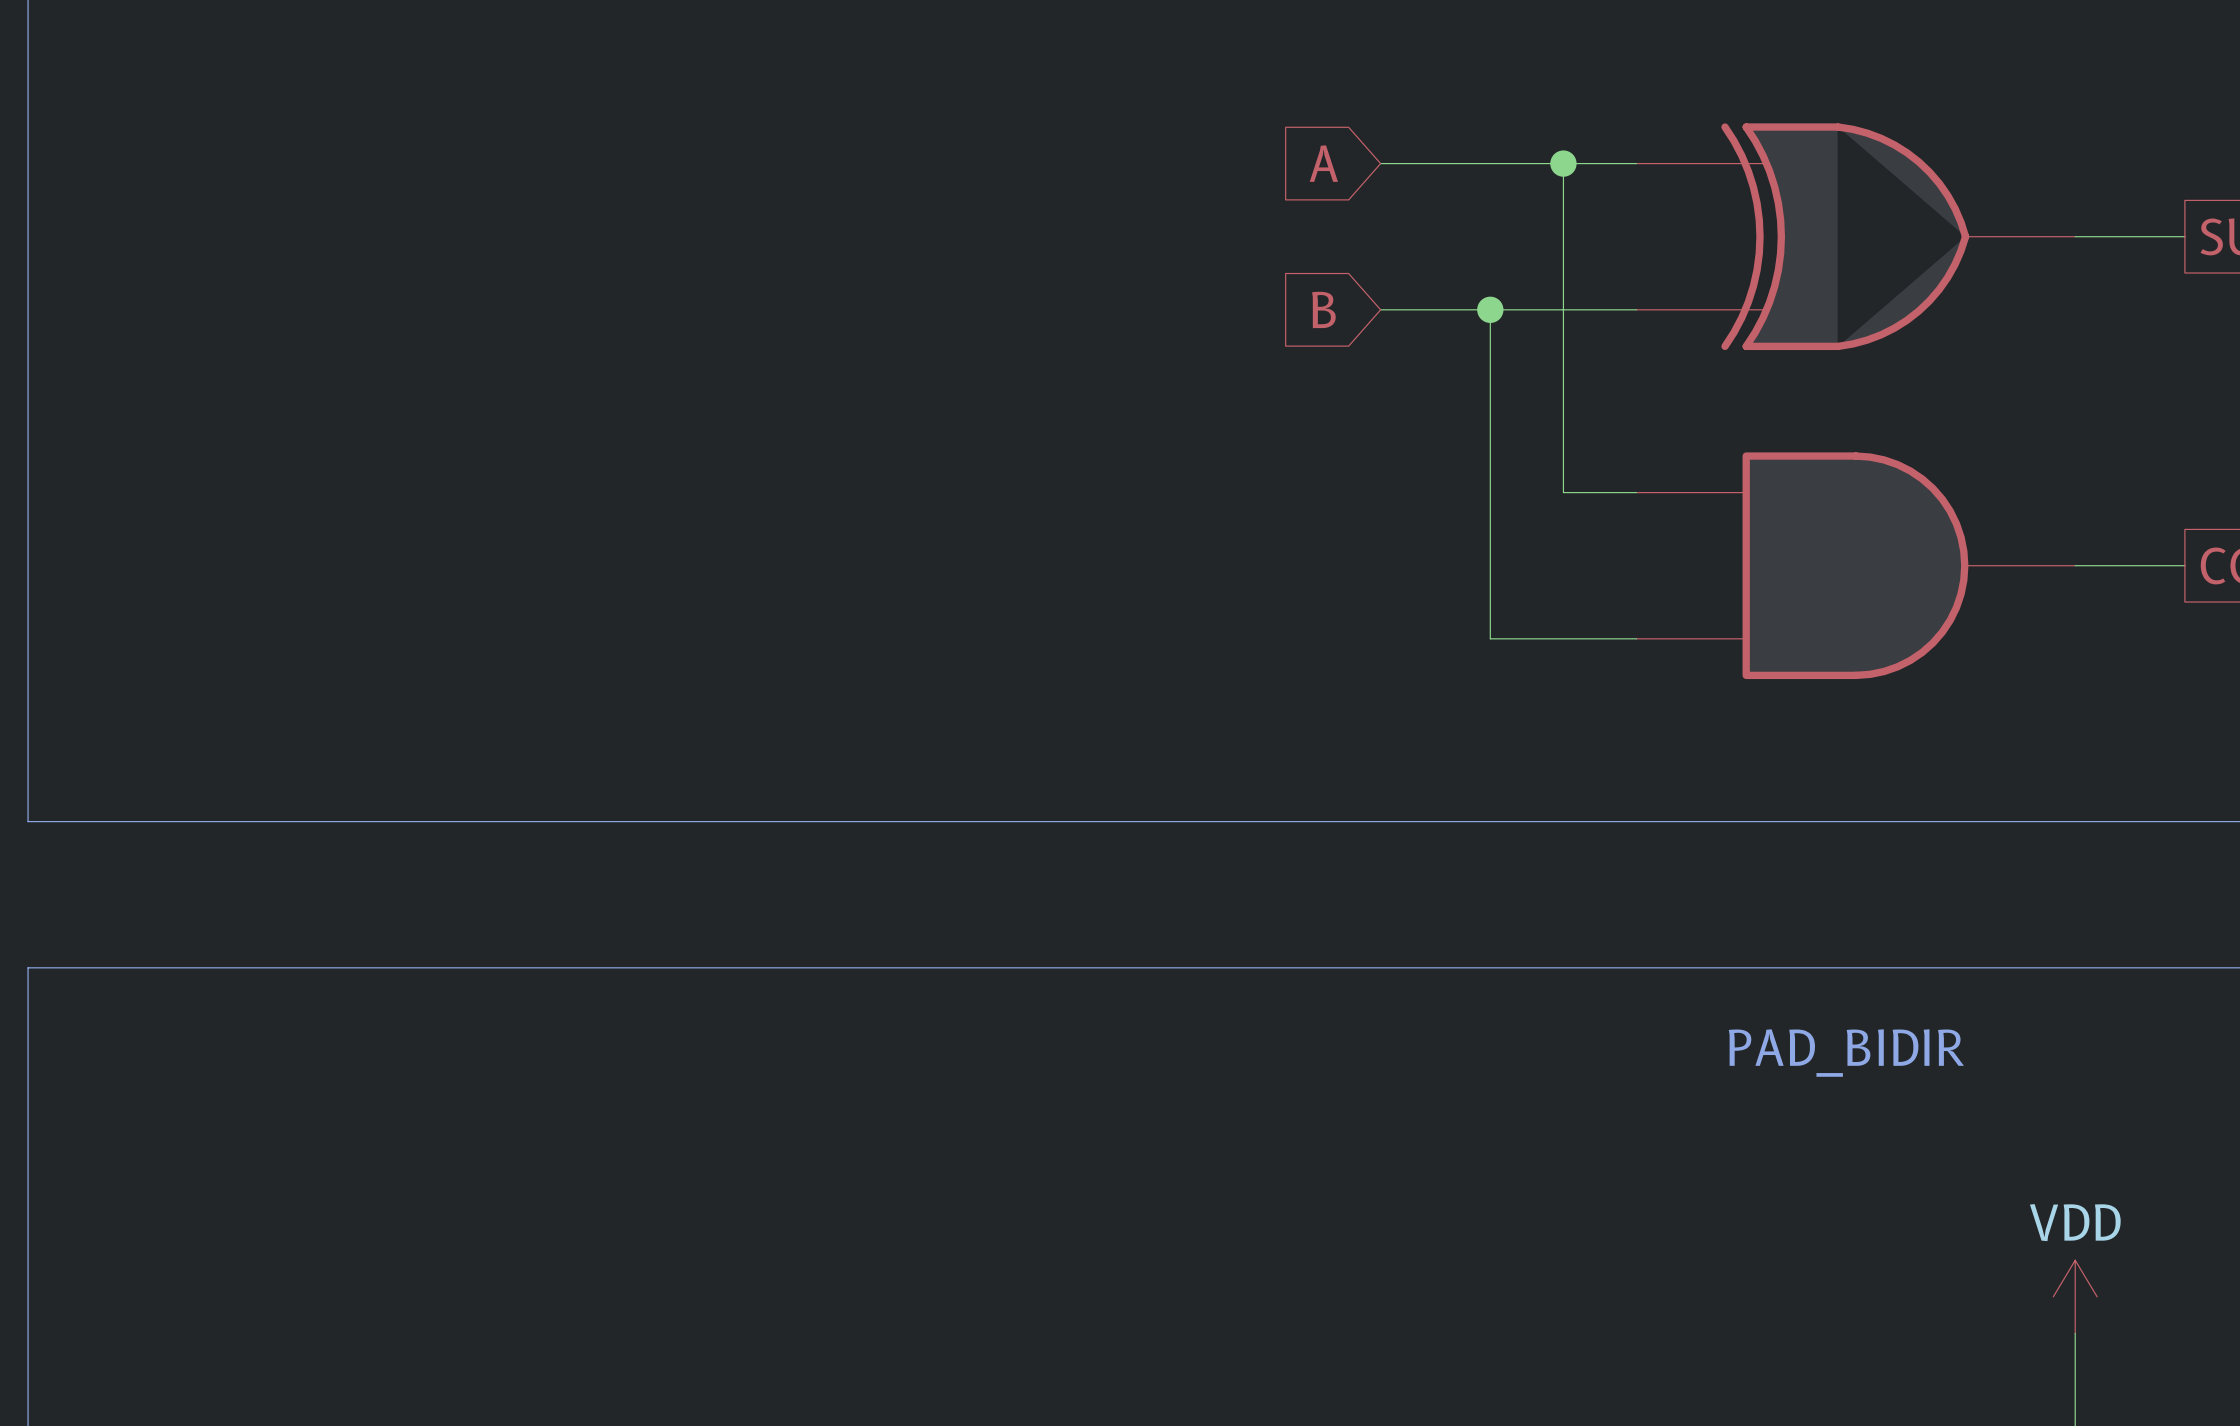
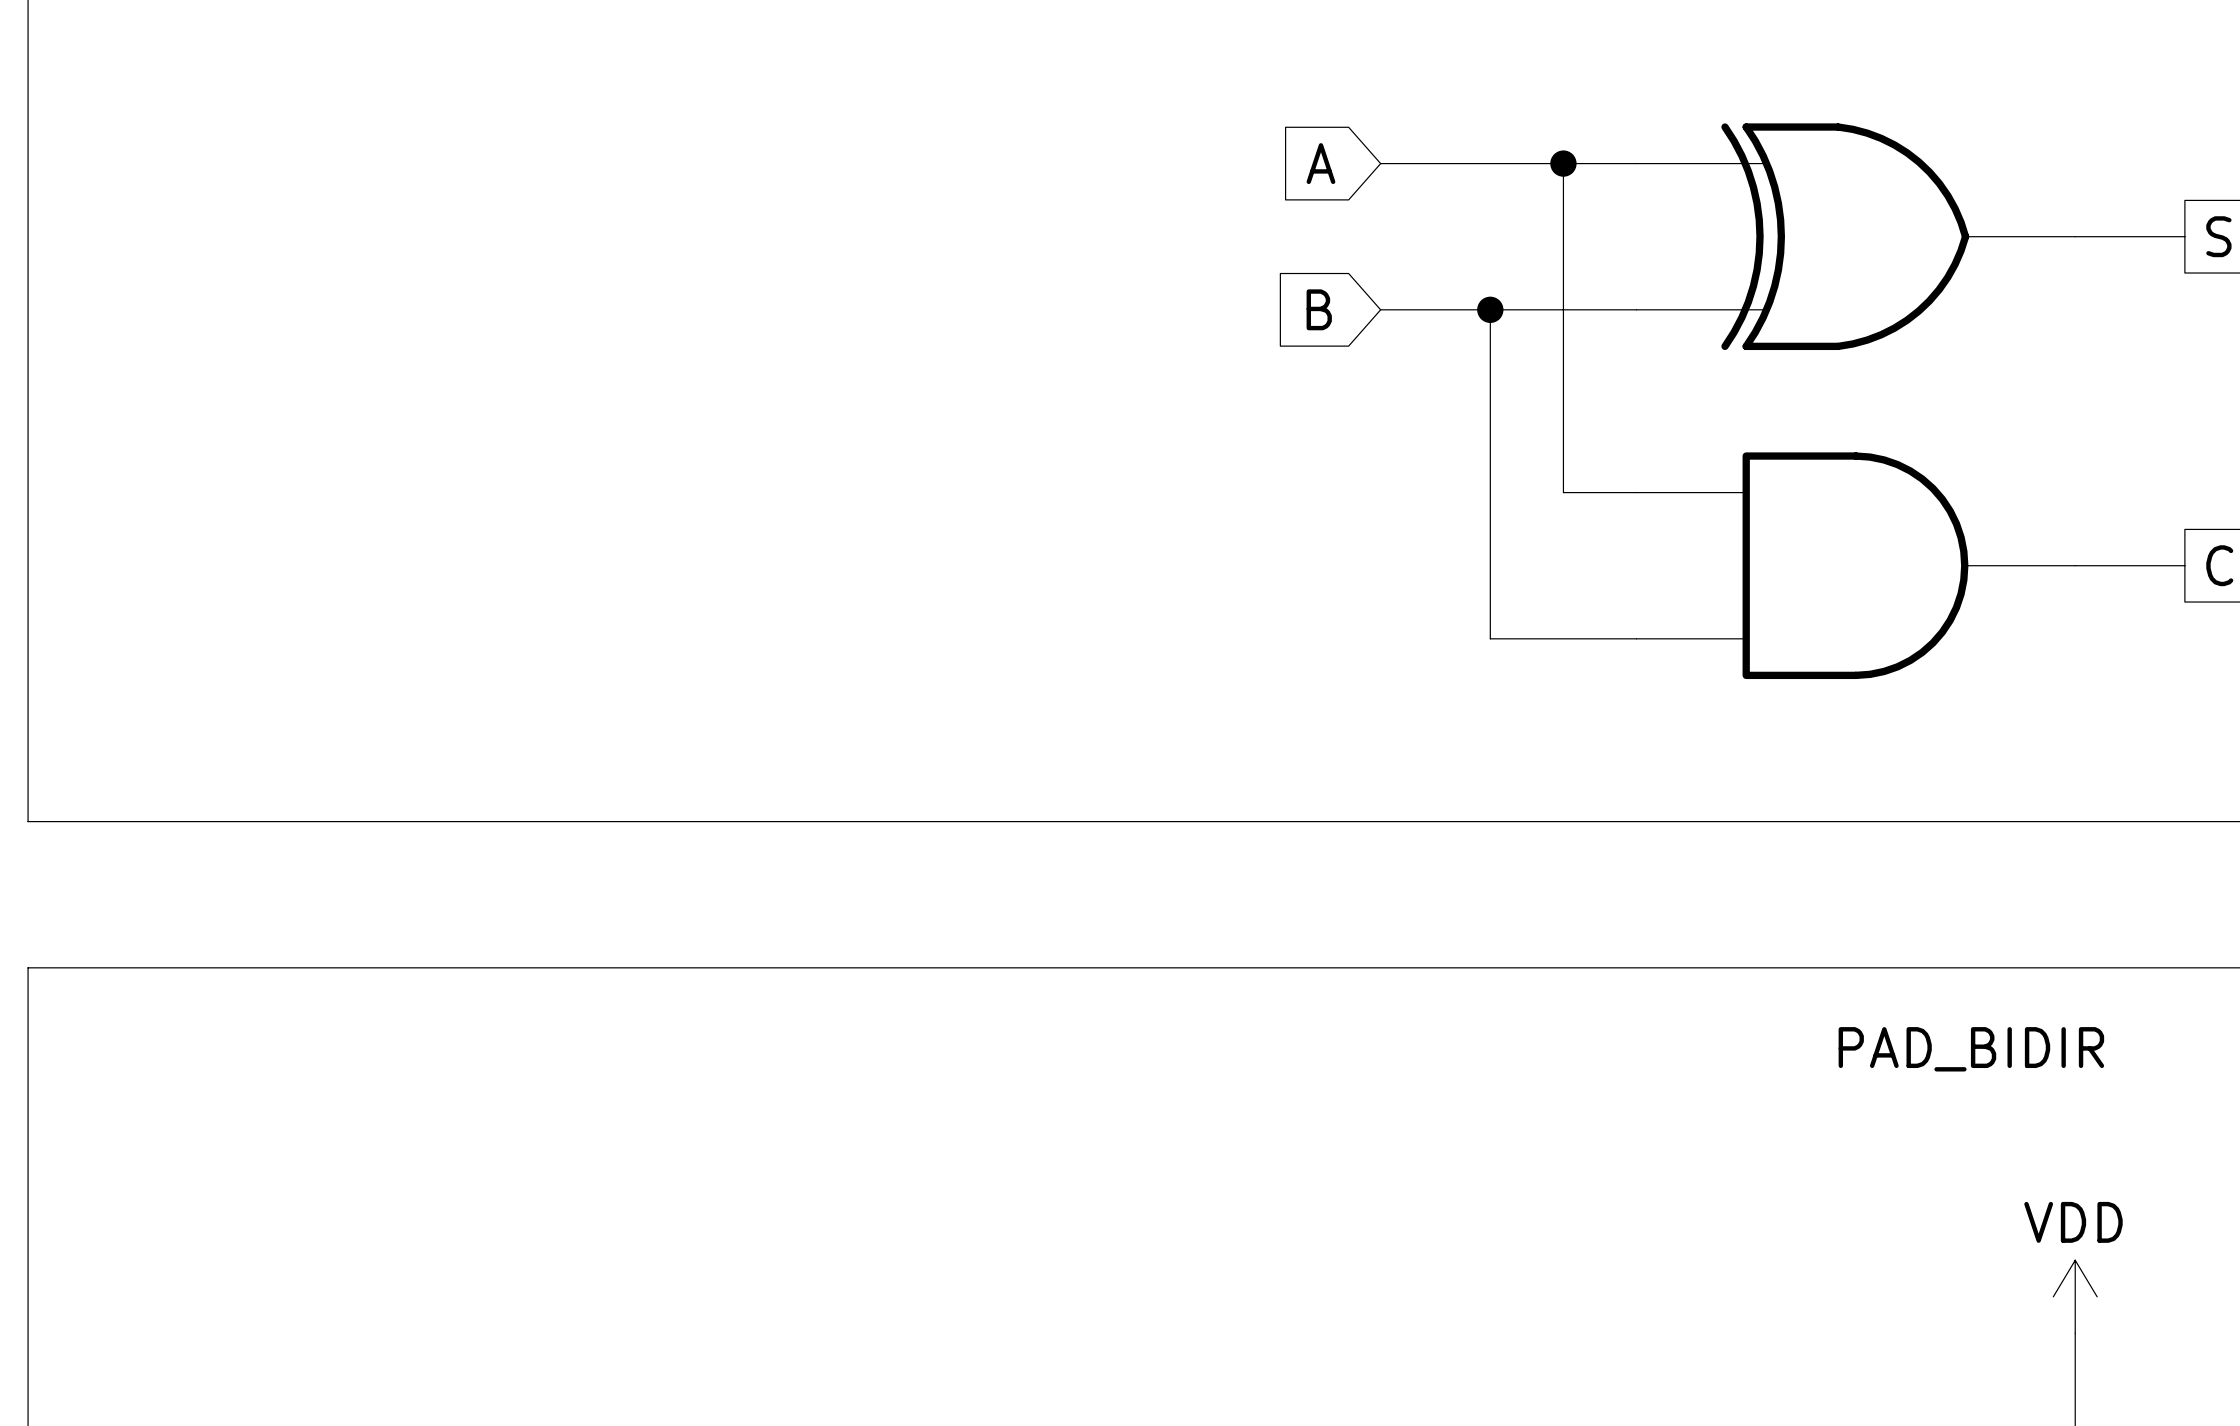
text position: PAD_BIDIR (1846, 1053) -> PAD_BIDIR (1971, 1049)

